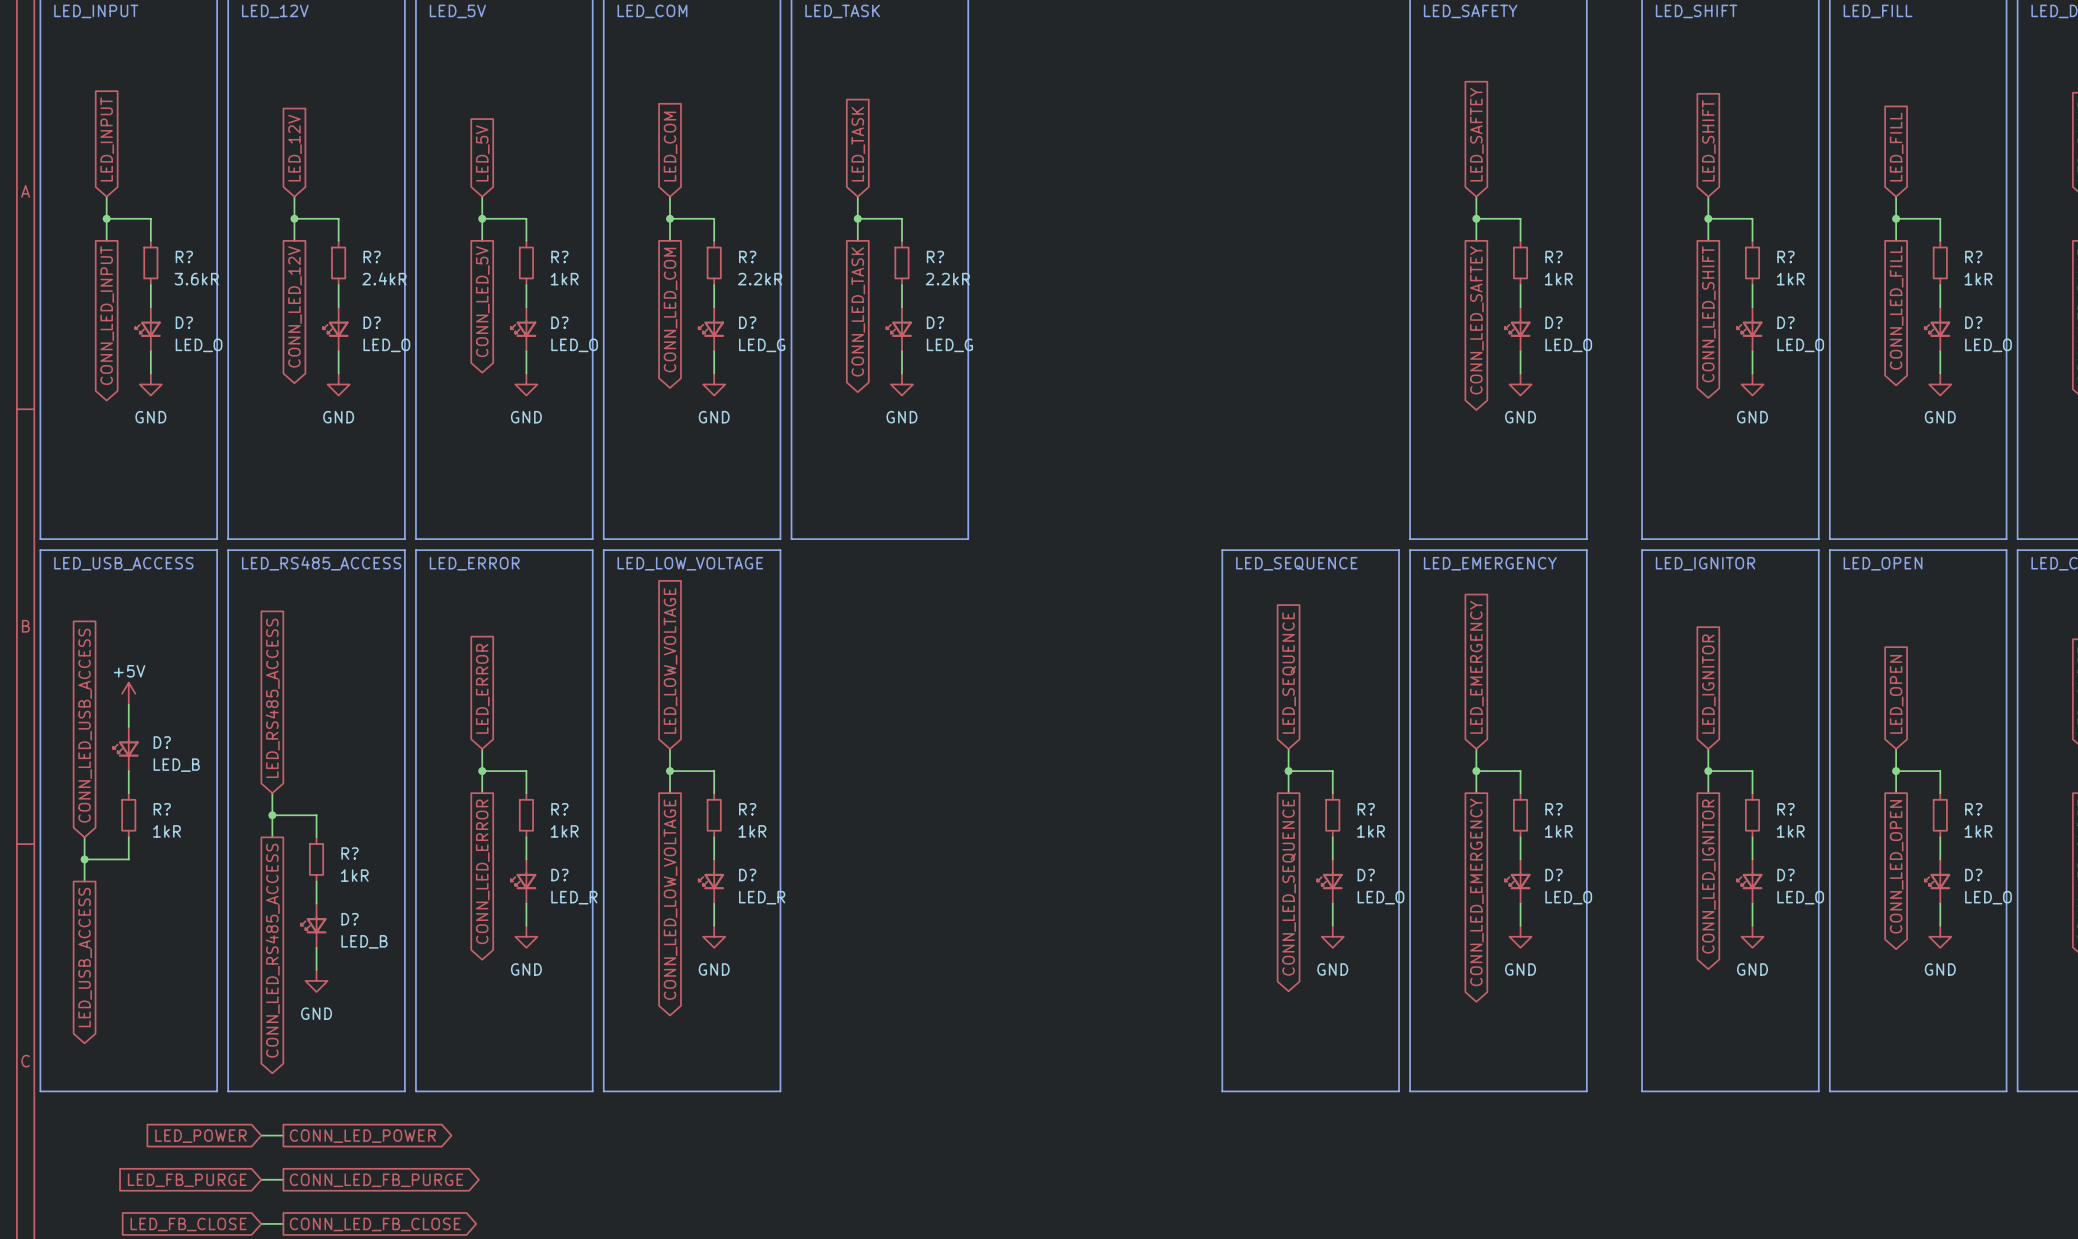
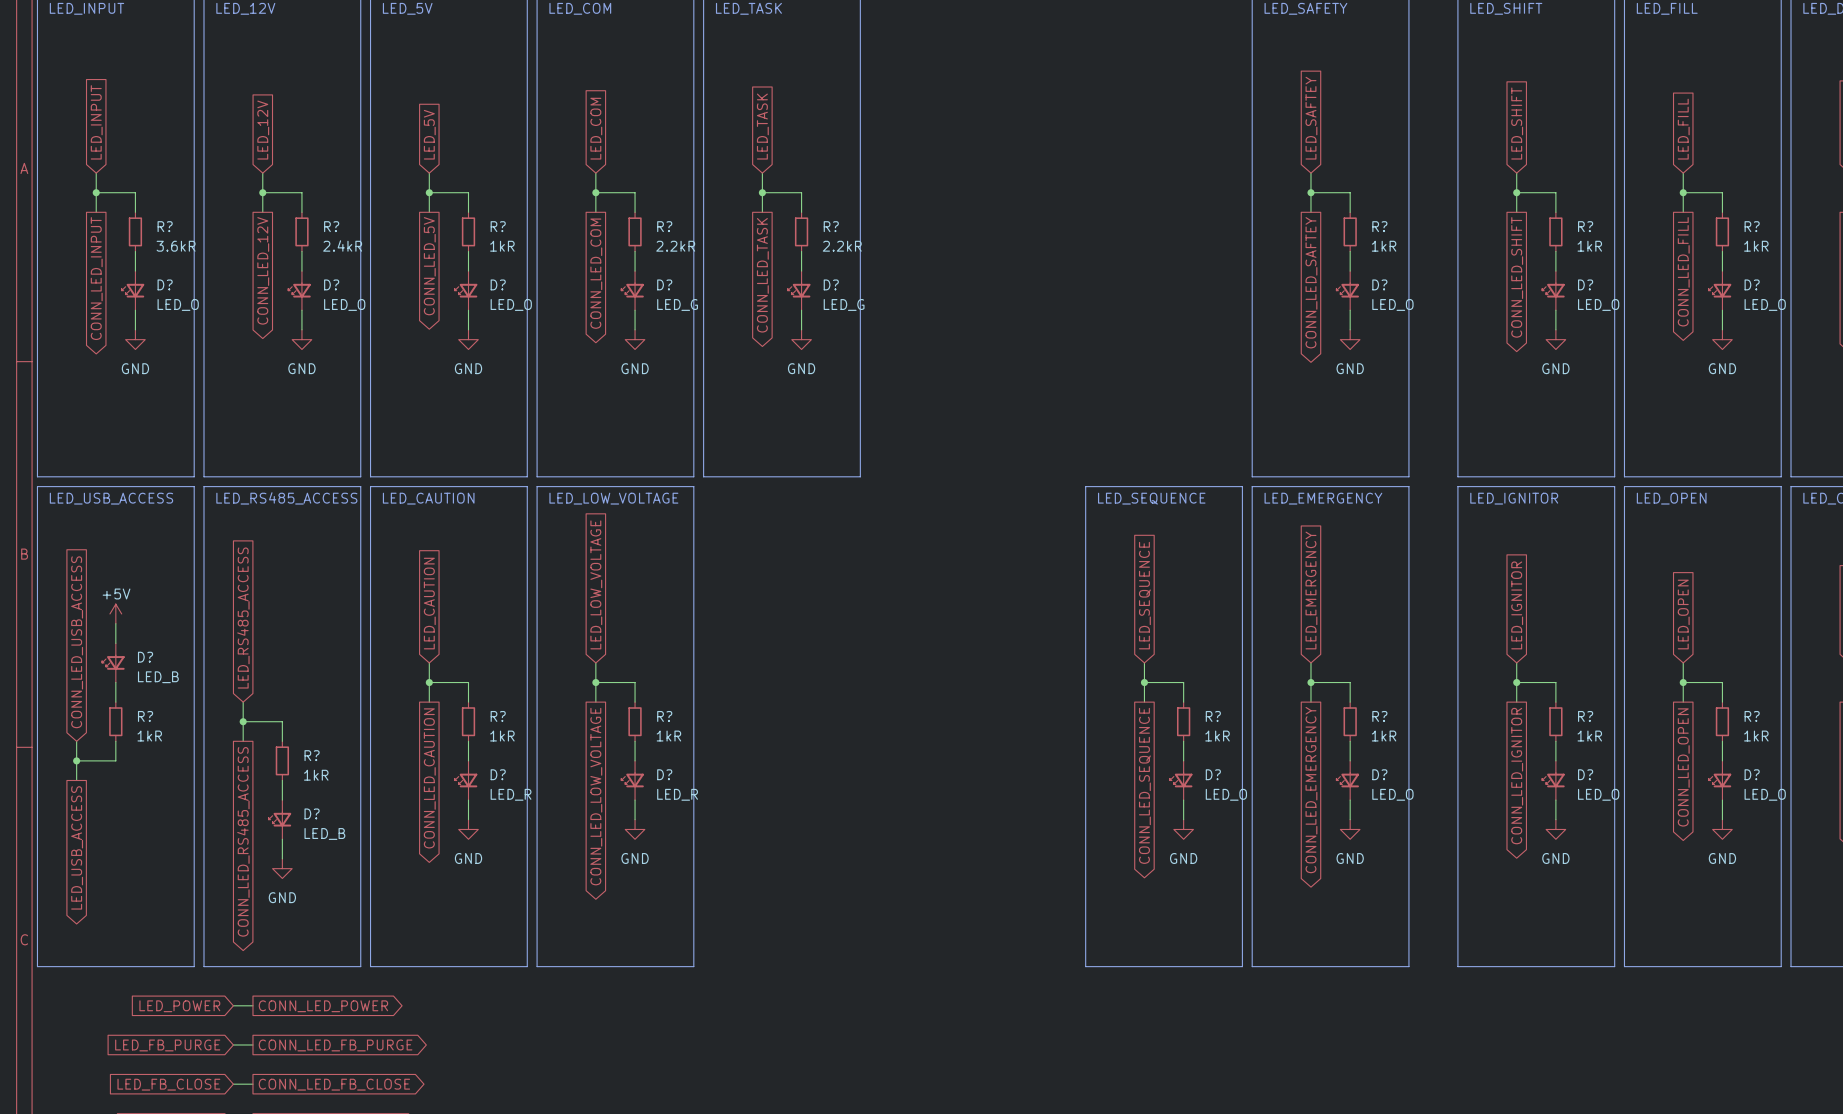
text: LED_ERROR (474, 563) -> LED_CAUTION (428, 498)
global label: LED_ERROR (482, 688) -> LED_CAUTION (429, 603)
global label: CONN_LED_ERROR (482, 871) -> CONN_LED_CAUTION (429, 778)

